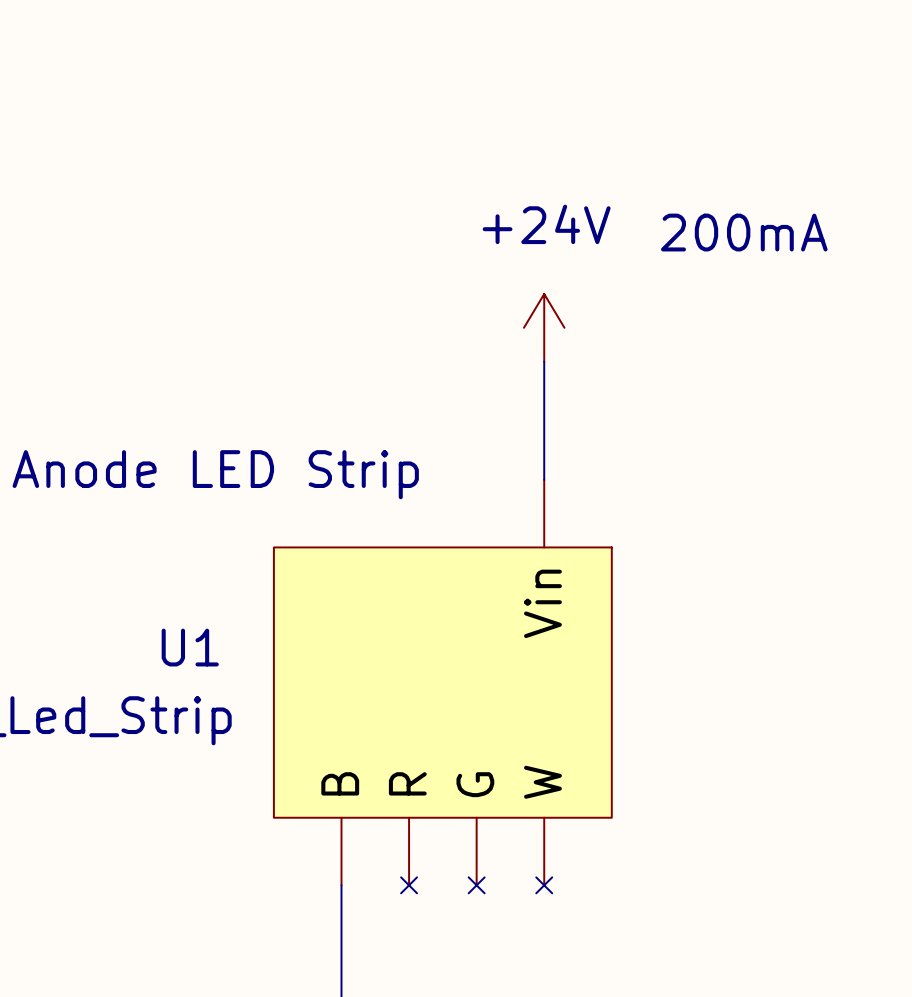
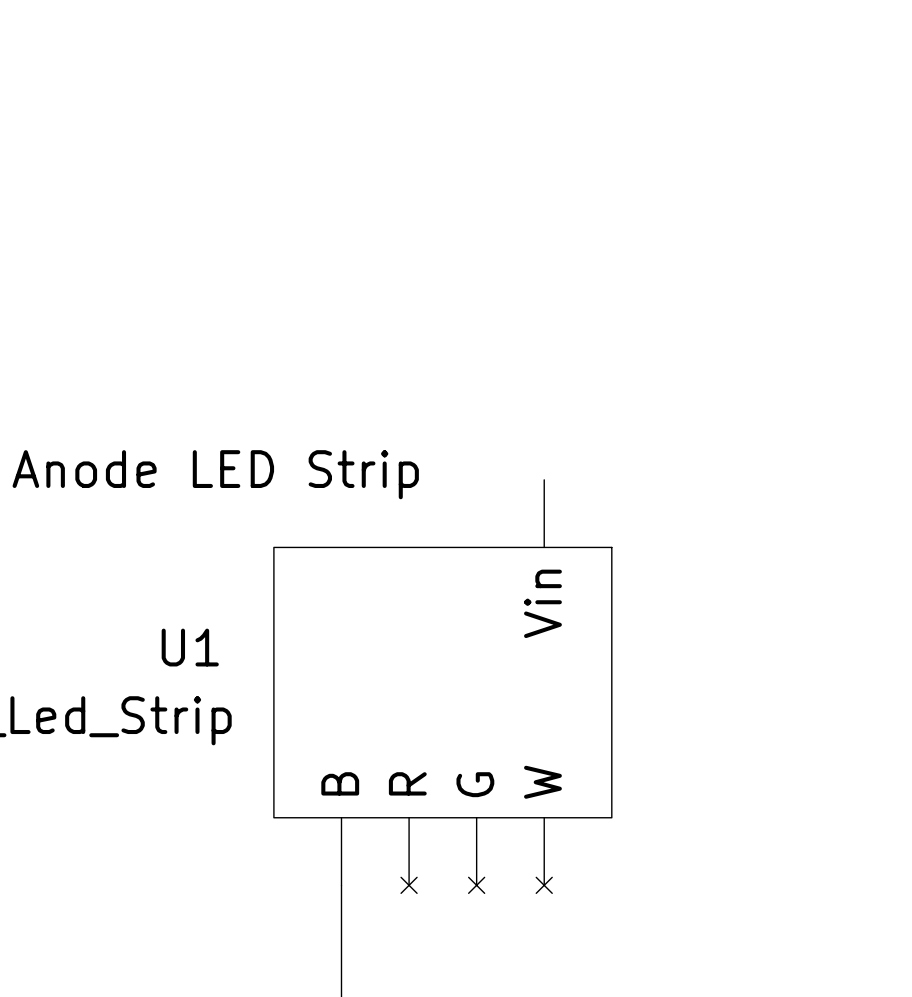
text: 200mA (744, 232) -> none
power symbol: +24V (544, 327) -> none
wire: (544, 361) (544, 479) -> none

